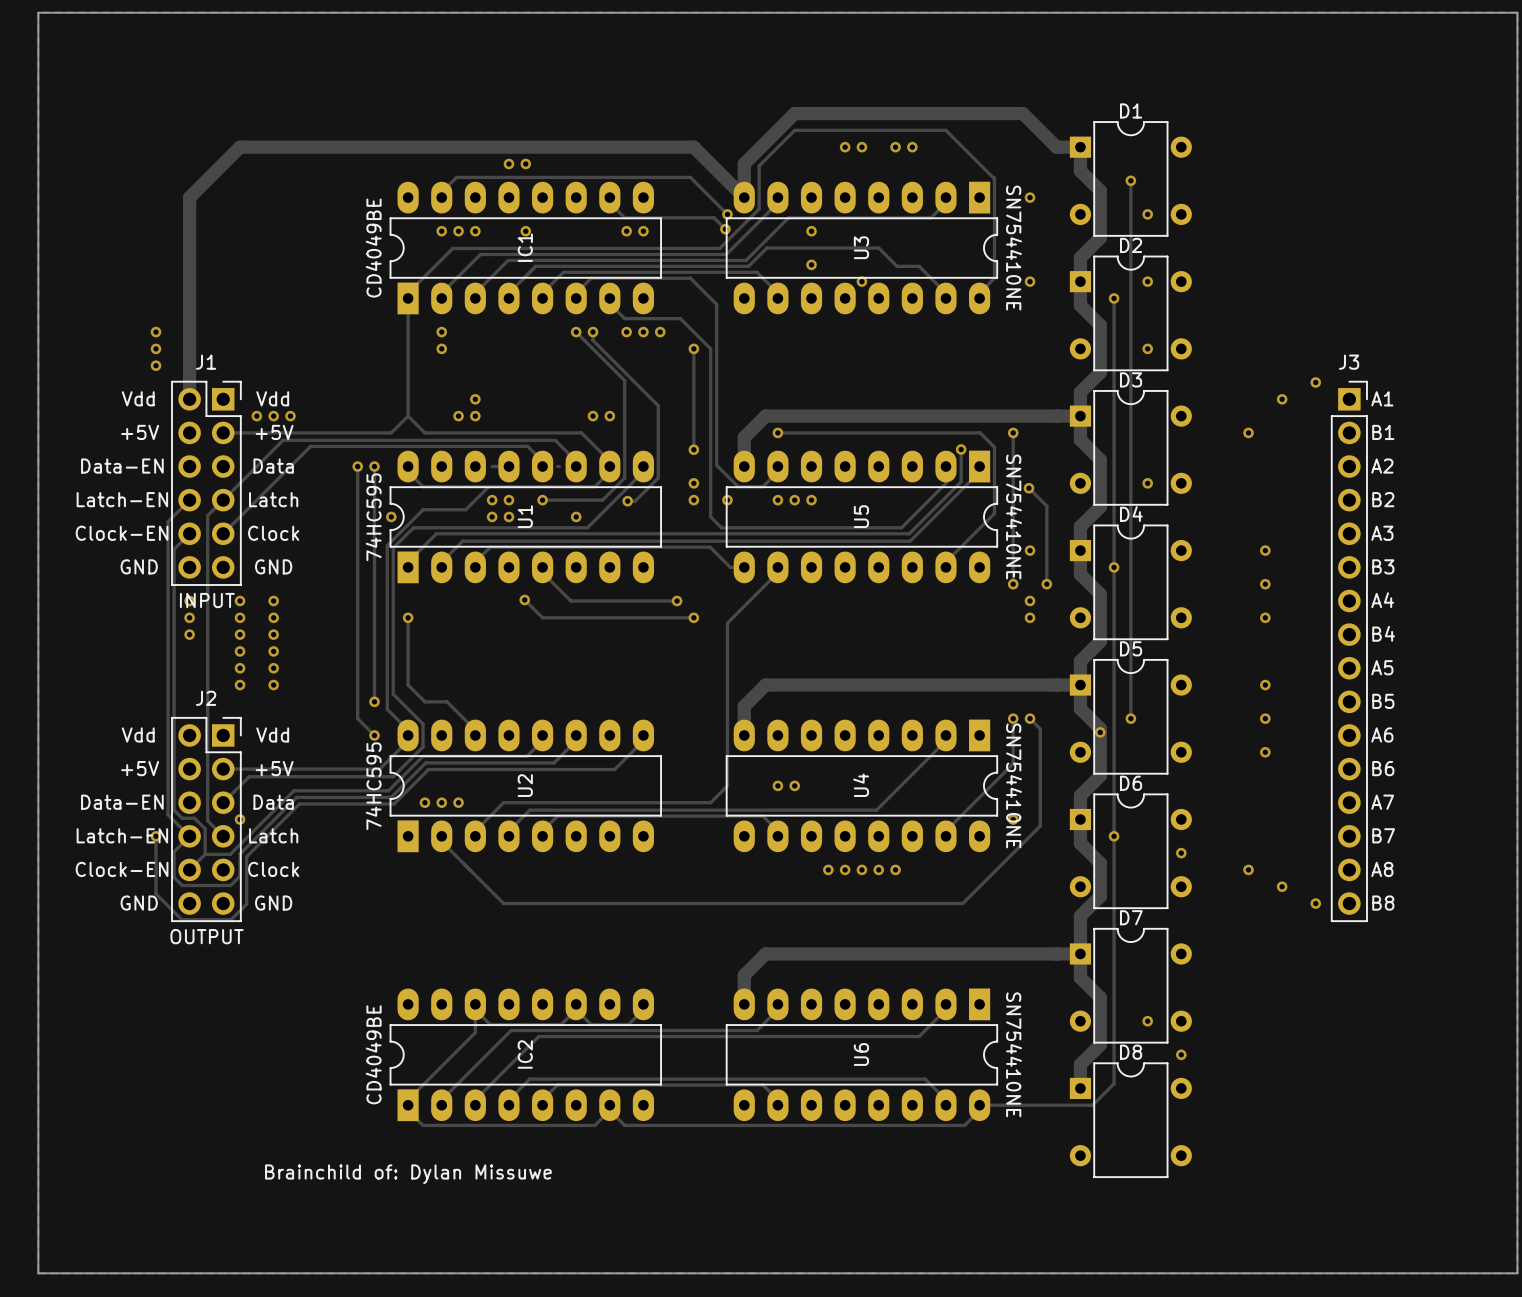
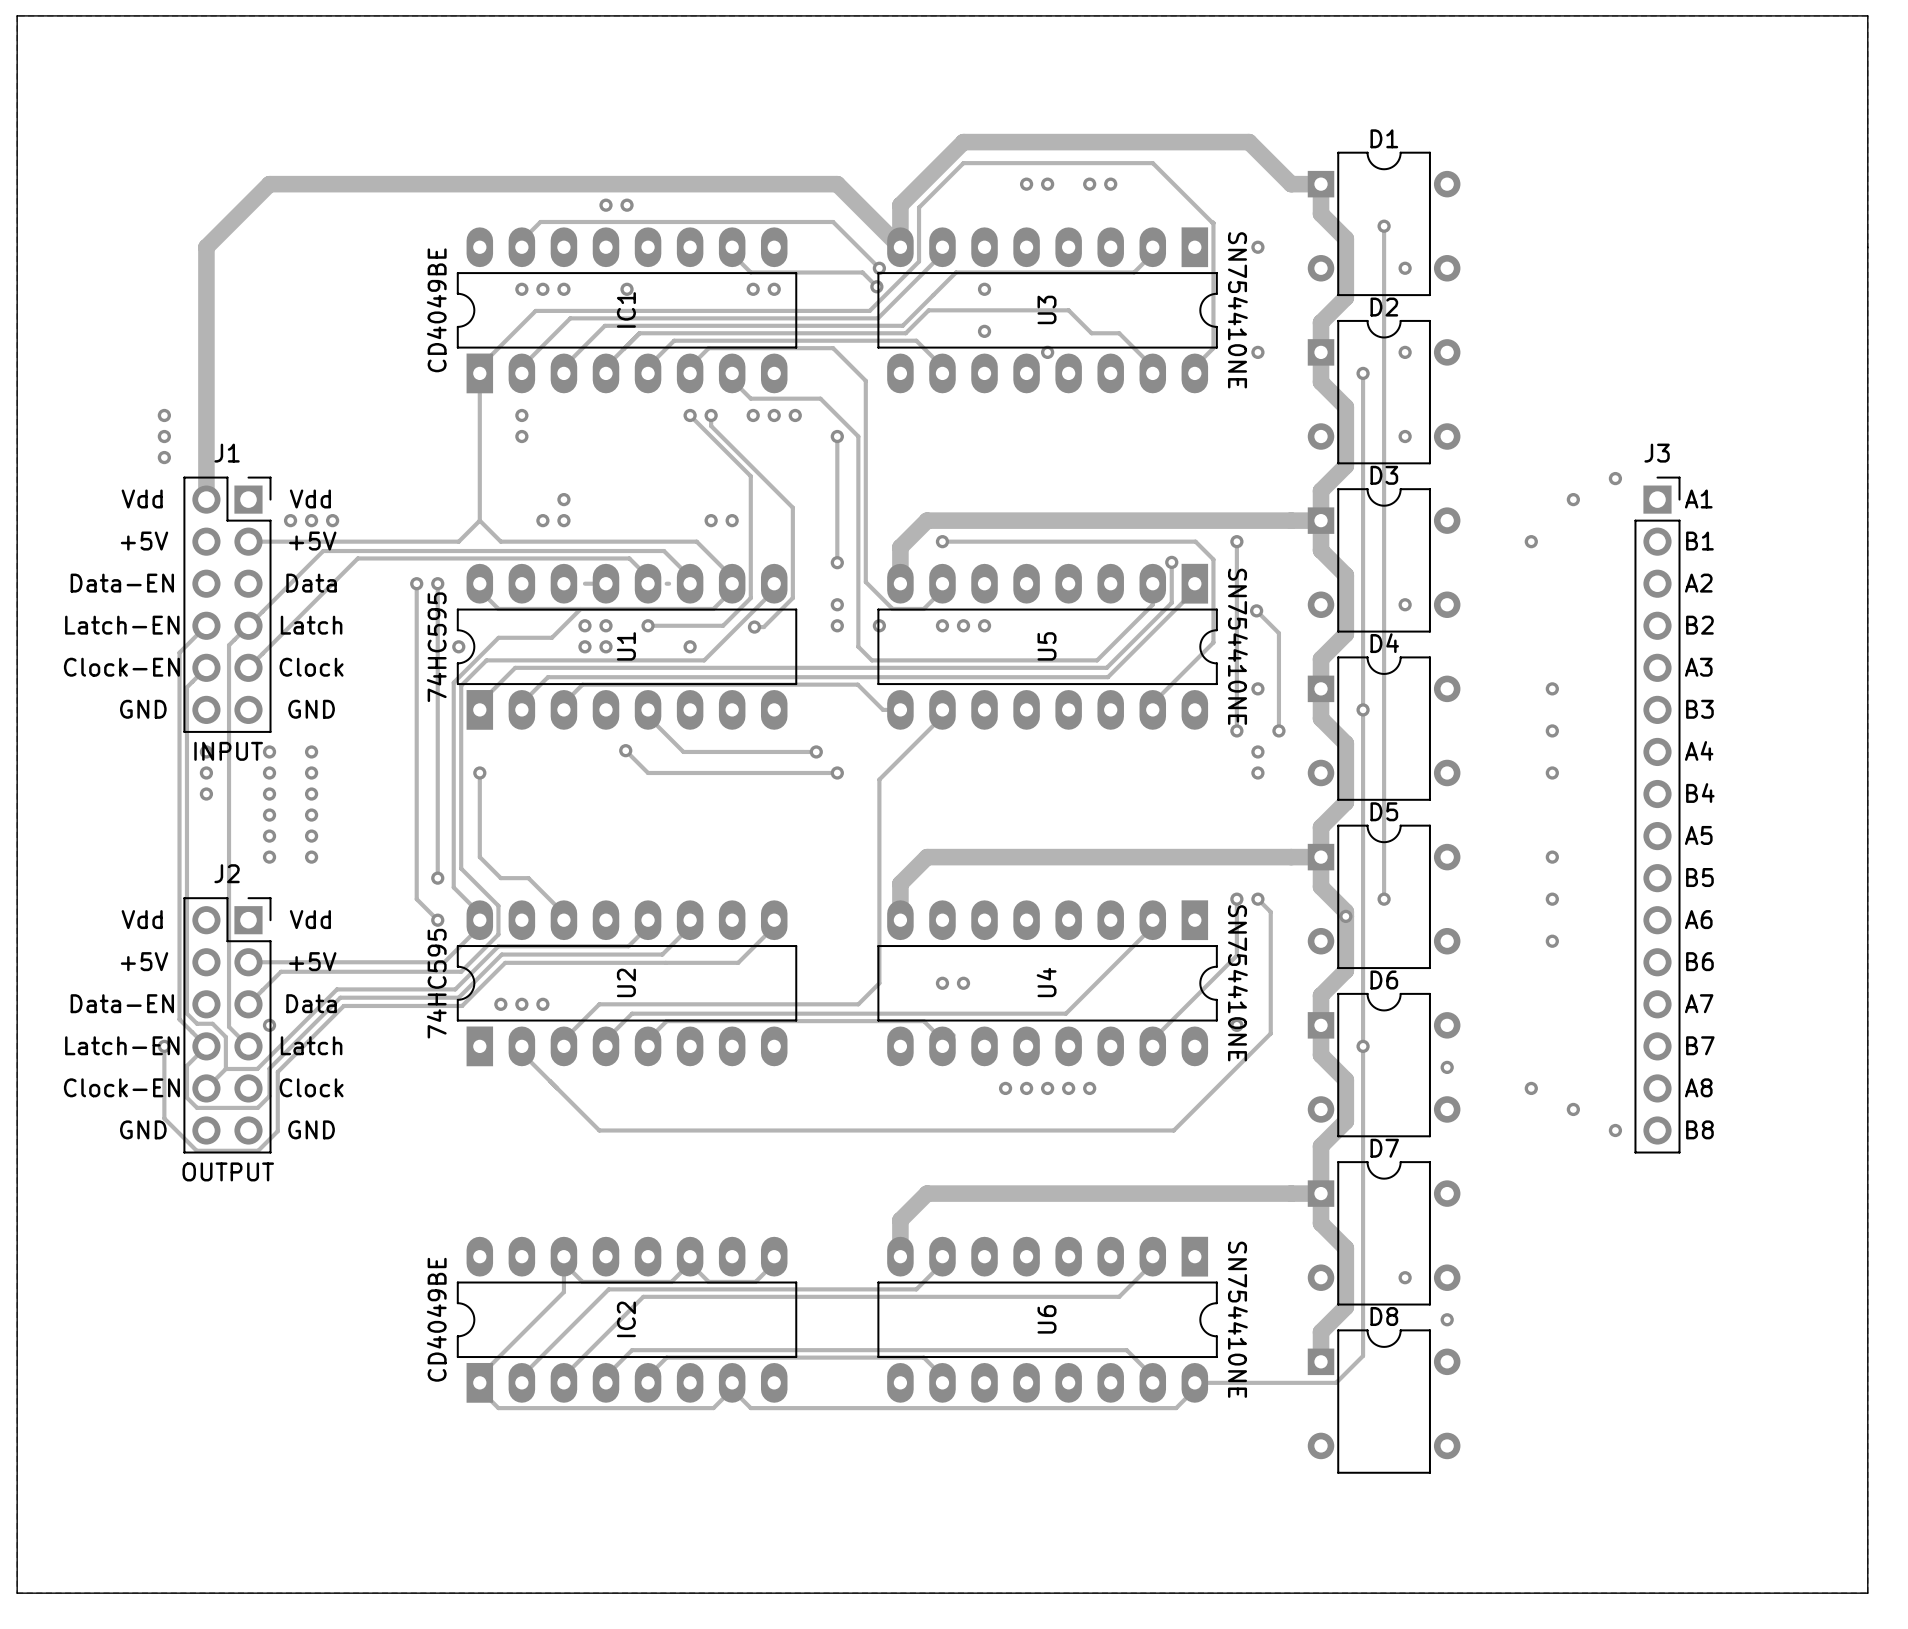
text: Brainchild of: Dylan Missuwe (408, 1174) -> none

